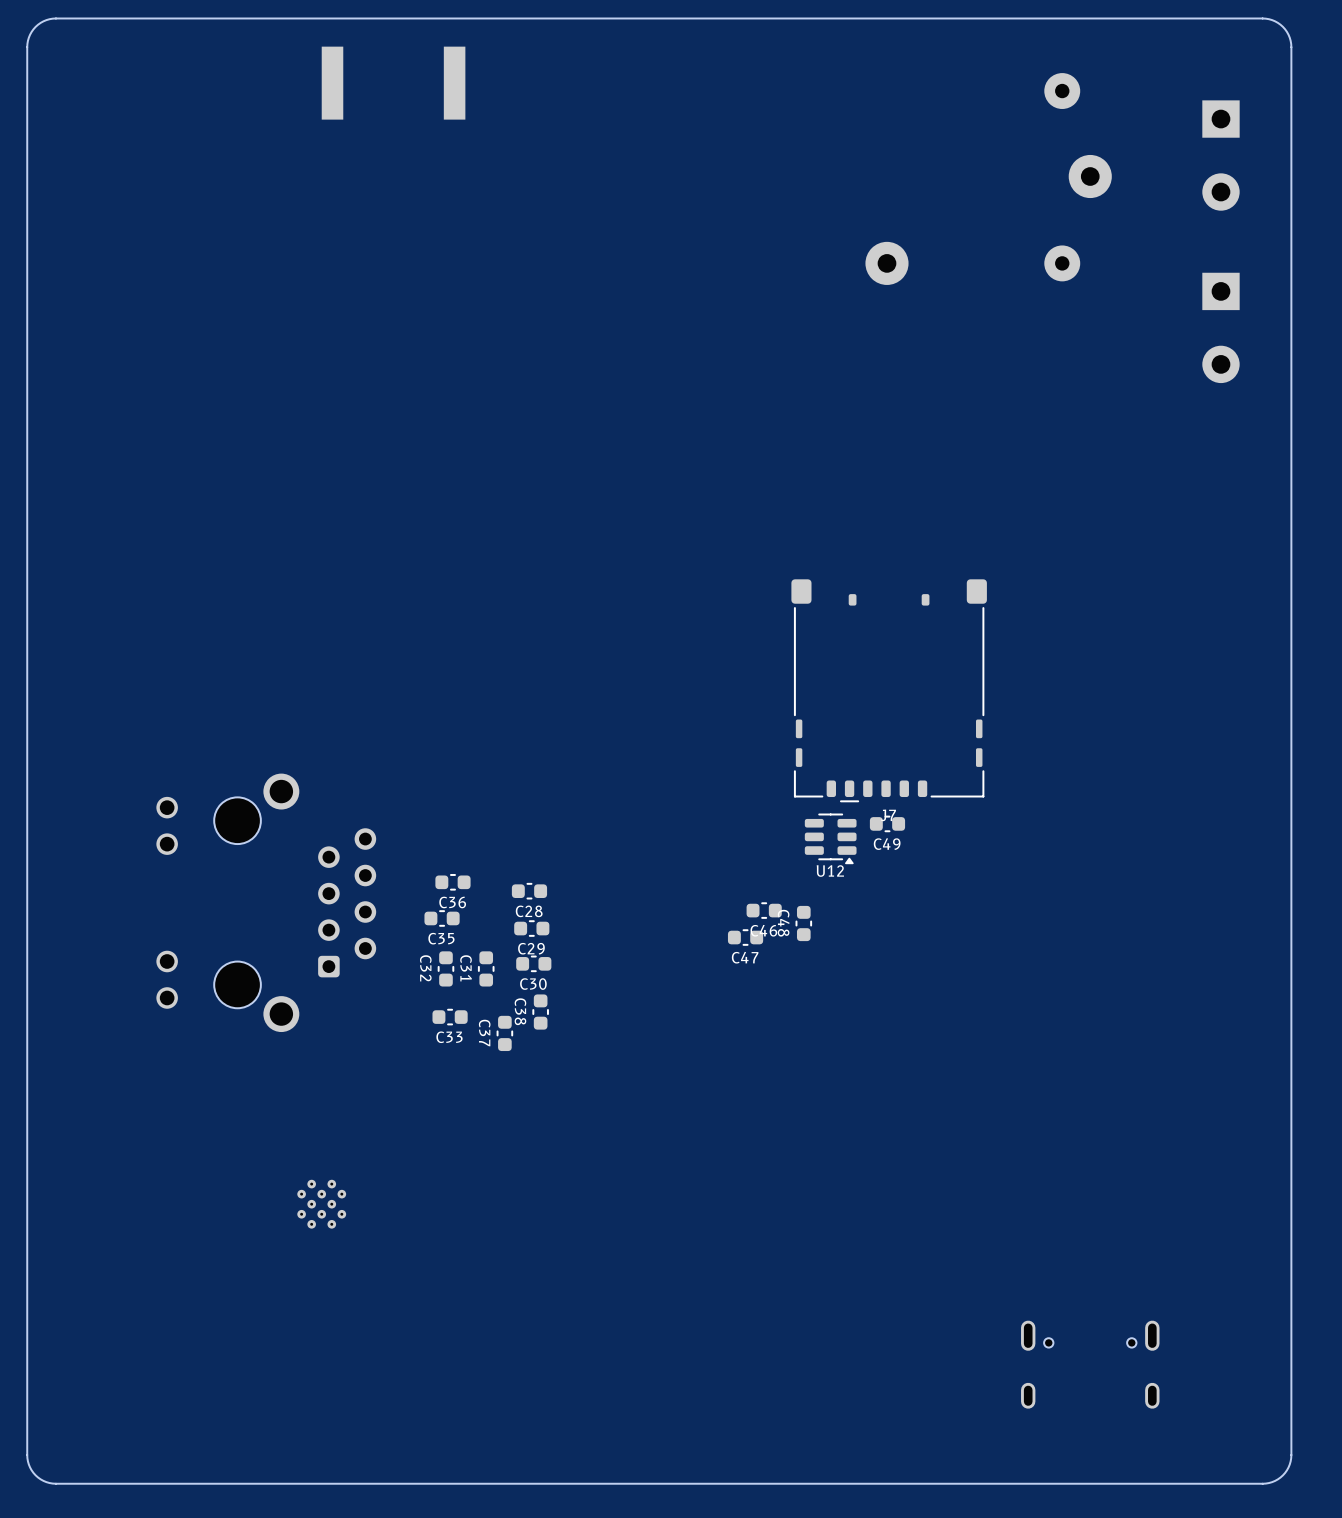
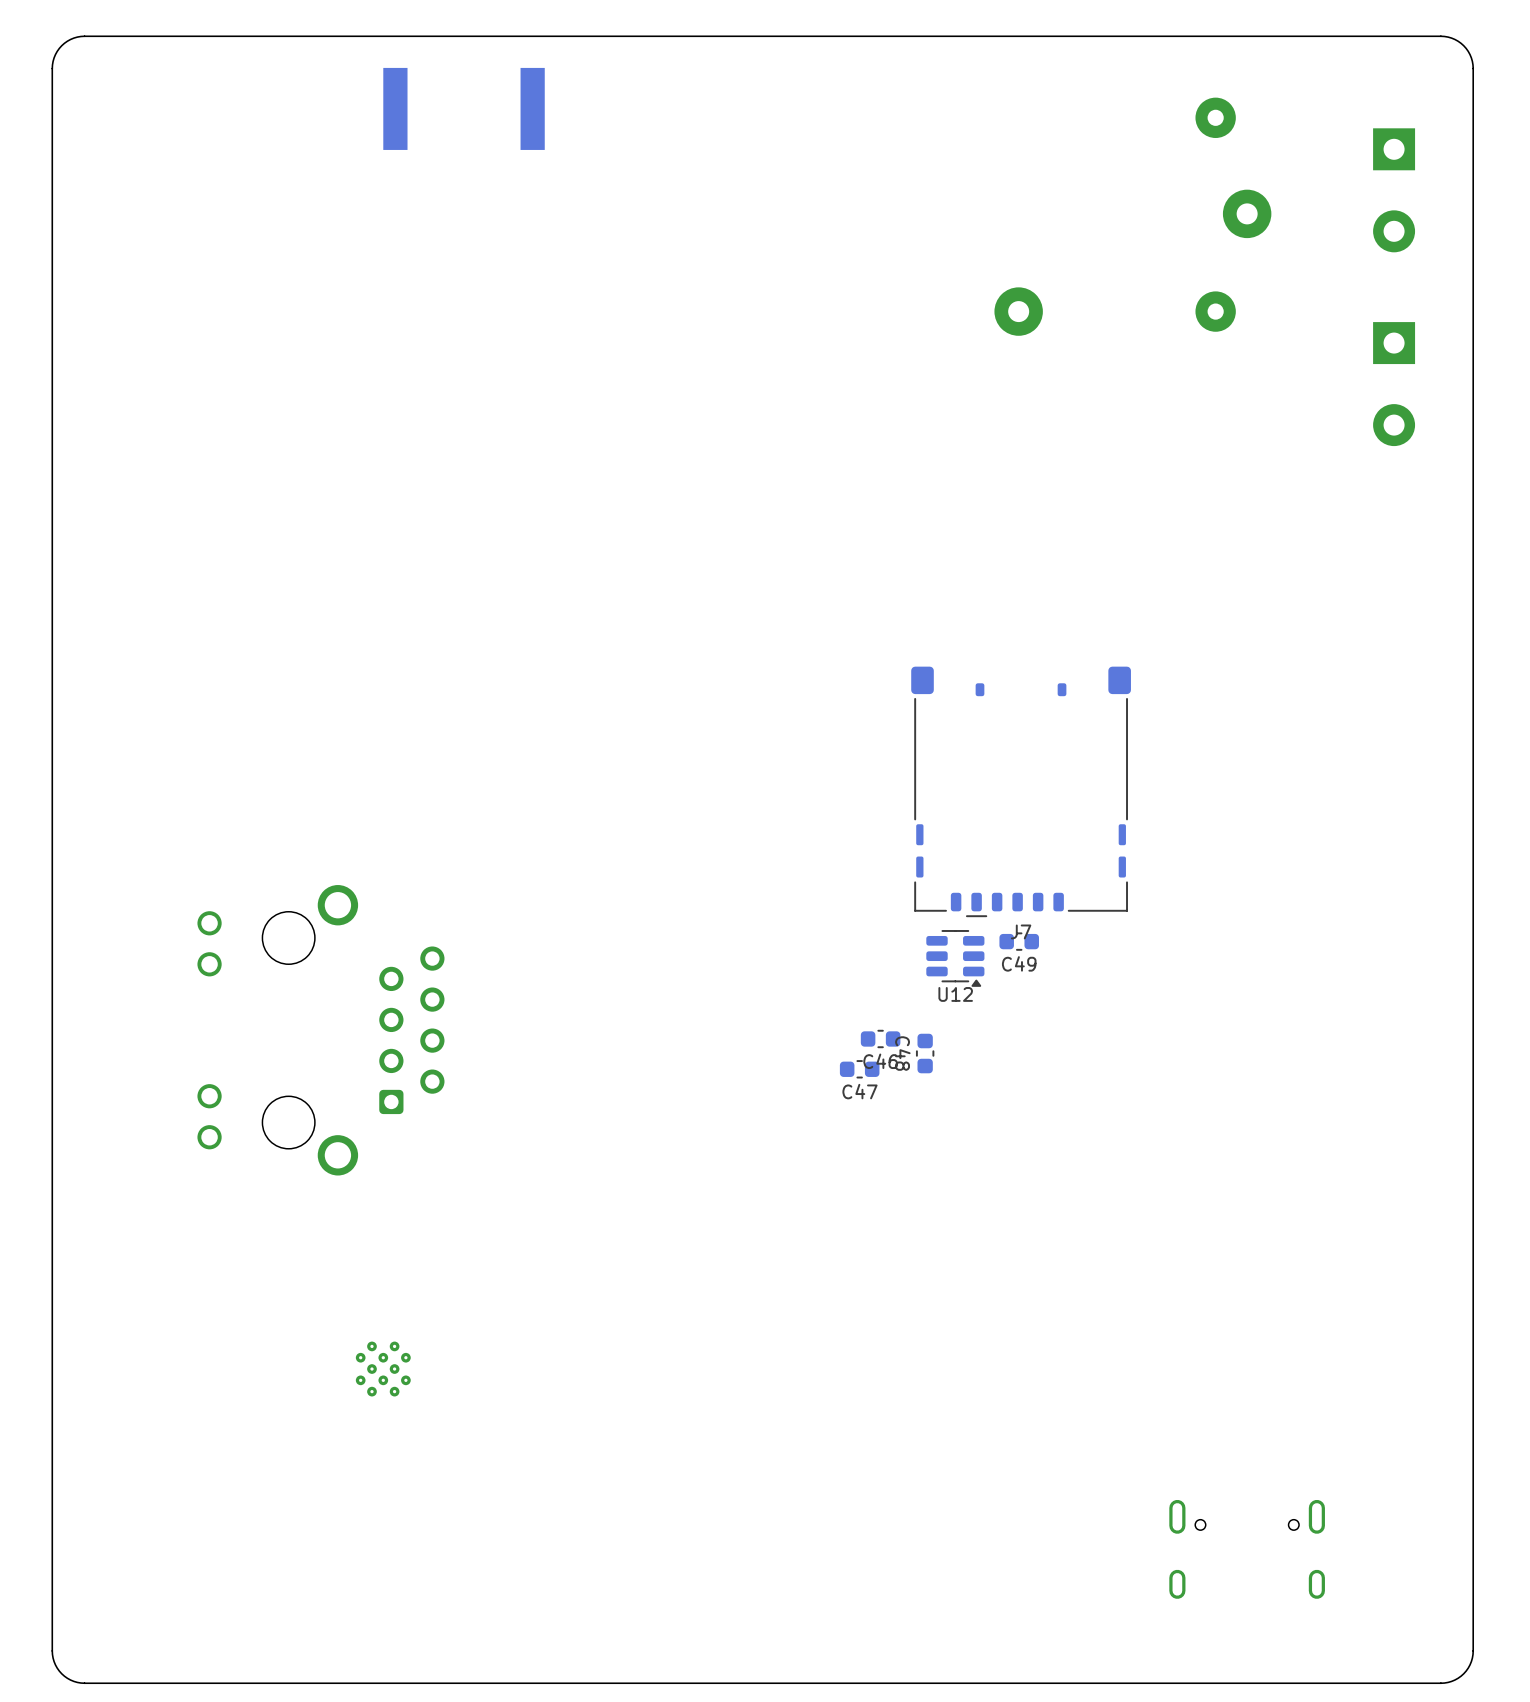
C36: (452, 882) -> none
C28: (529, 891) -> none
C35: (442, 918) -> none
C29: (531, 928) -> none
C30: (533, 963) -> none
C32: (445, 968) -> none
C31: (486, 968) -> none
C38: (540, 1012) -> none
C33: (450, 1017) -> none
C37: (504, 1033) -> none

